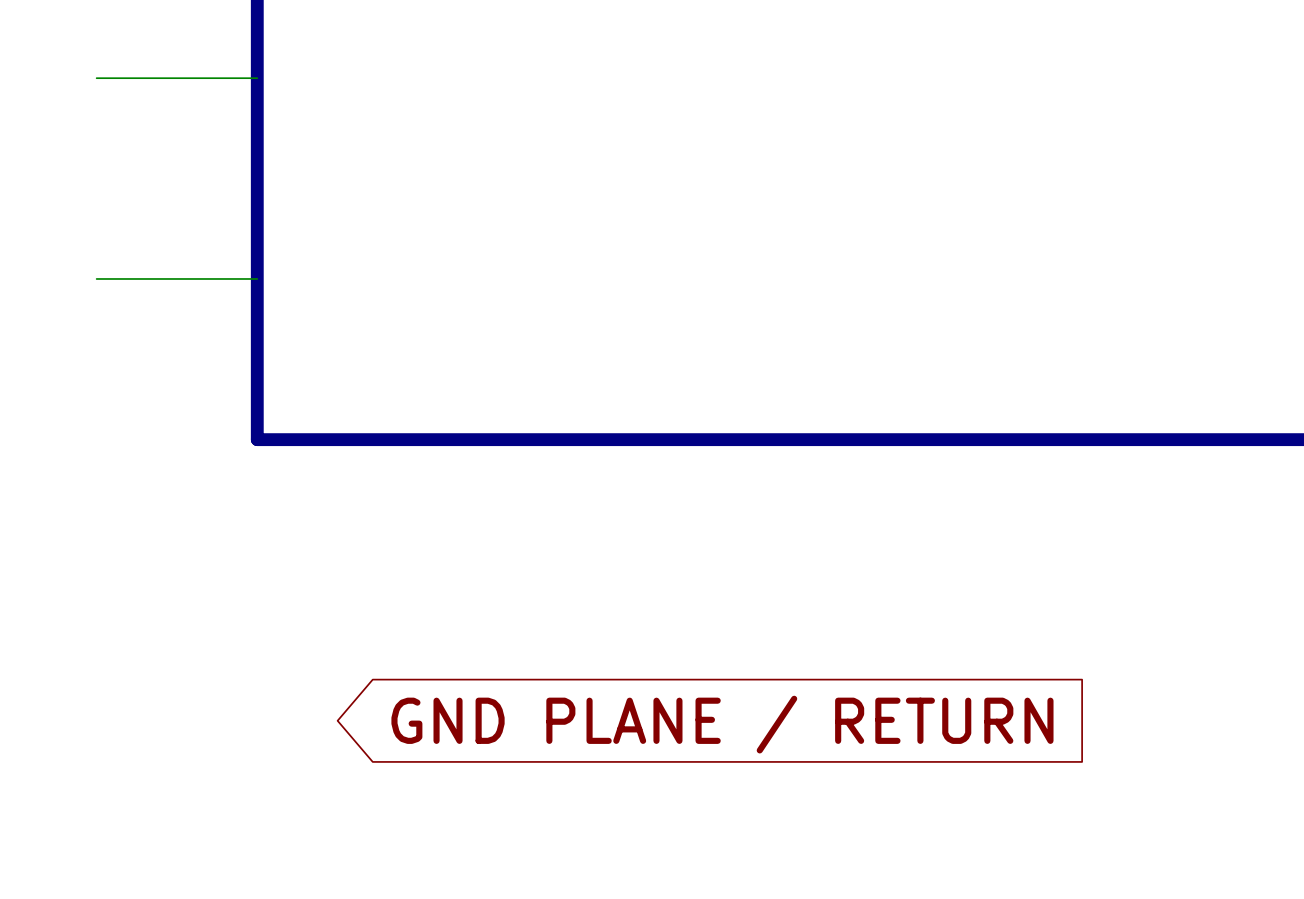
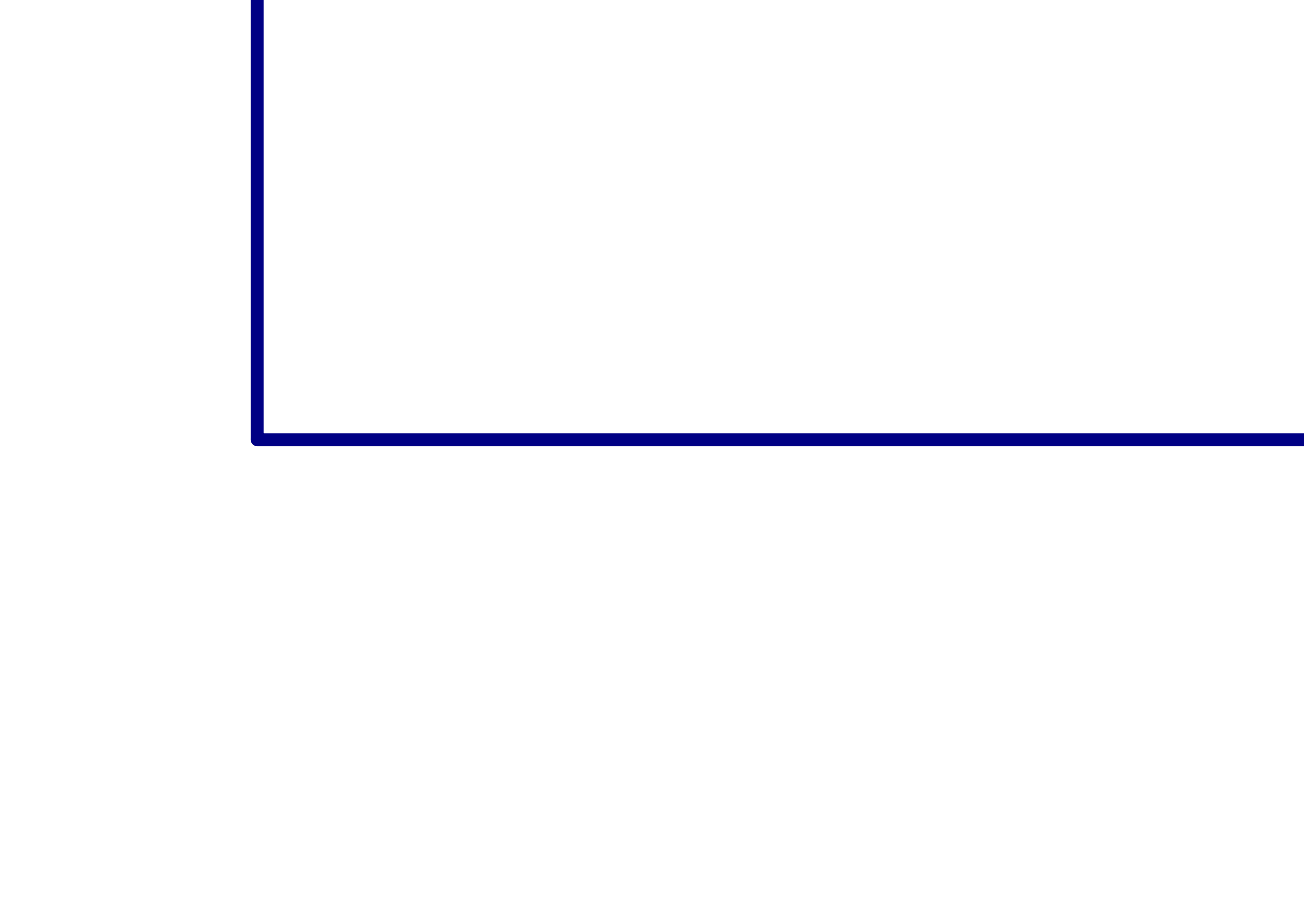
wire: (96, 78) (257, 78) -> none
wire: (96, 278) (257, 278) -> none
global label: GND PLANE / RETURN (722, 724) -> none

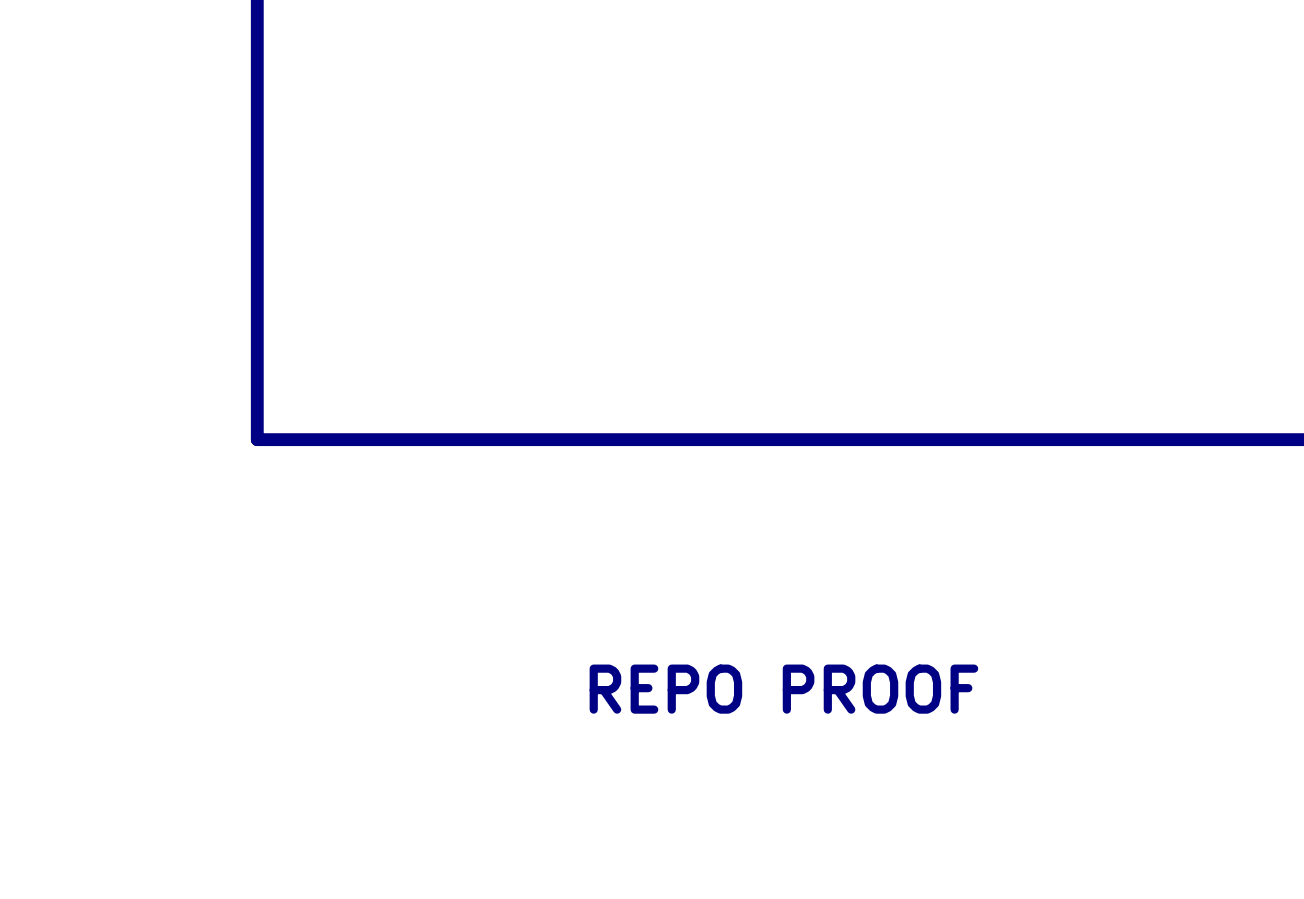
text: none -> REPO PROOF (783, 689)

